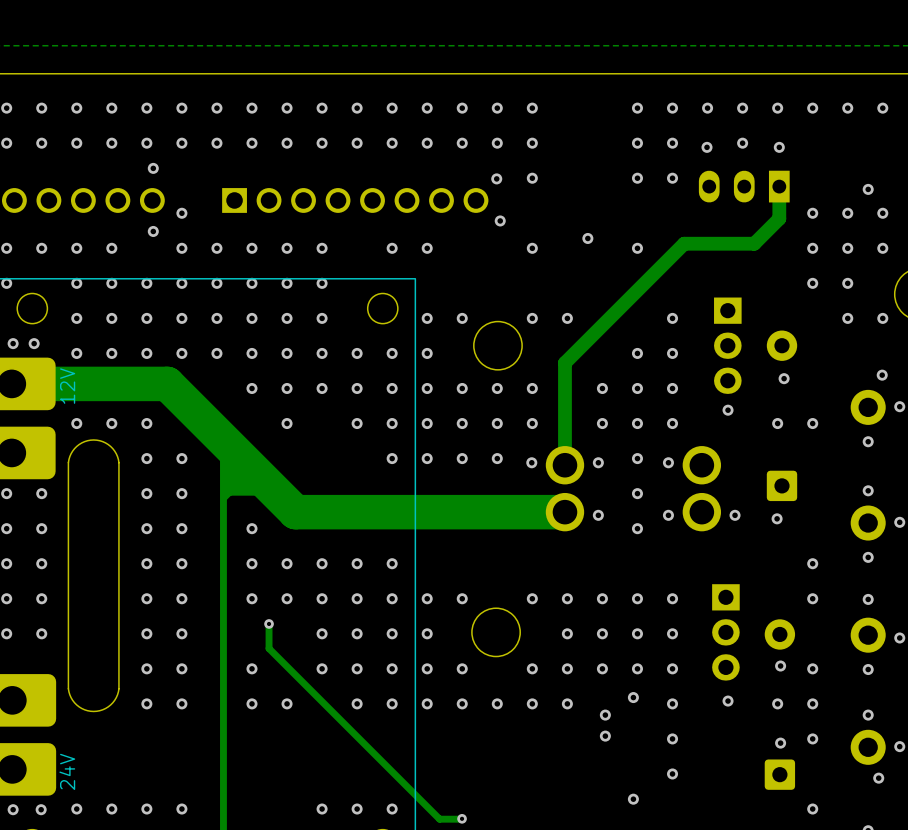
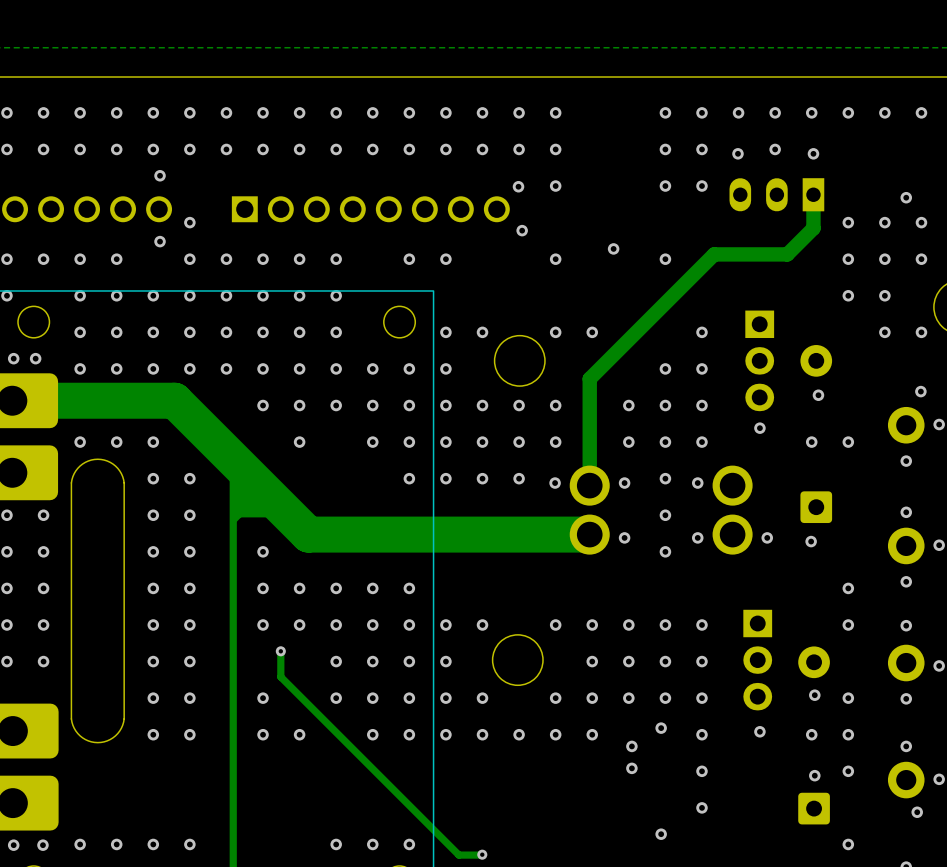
text: 12V (67, 386) -> none
text: 24V (67, 771) -> none

